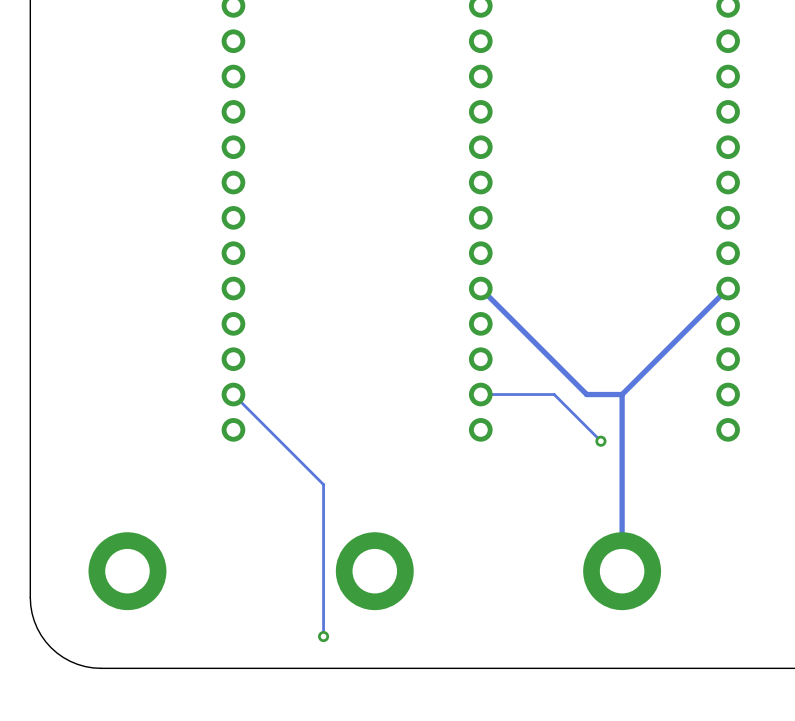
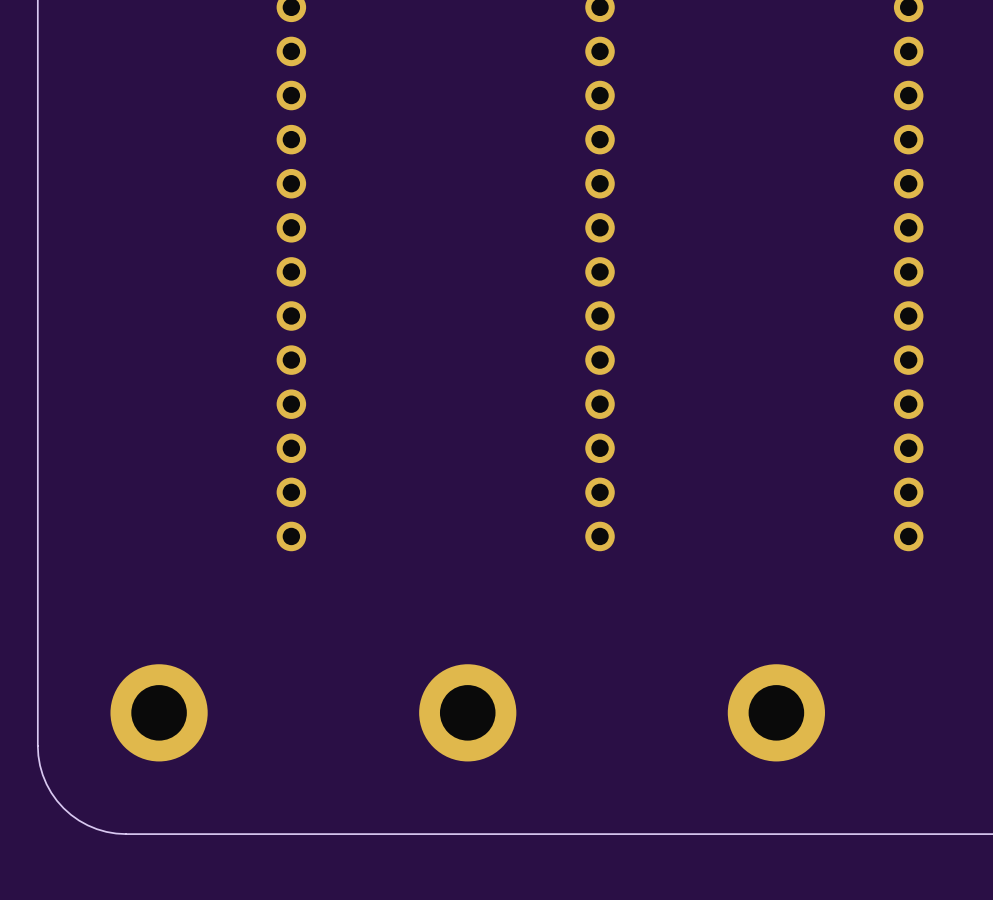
track: (480, 288) (586, 394) (622, 394) -> none
track: (728, 288) (622, 394) -> none
track: (233, 394) (323, 484) (323, 636) -> none
track: (480, 394) (554, 394) (600, 441) -> none
track: (622, 394) (622, 571) -> none
via: (600, 441) -> none
via: (323, 636) -> none

